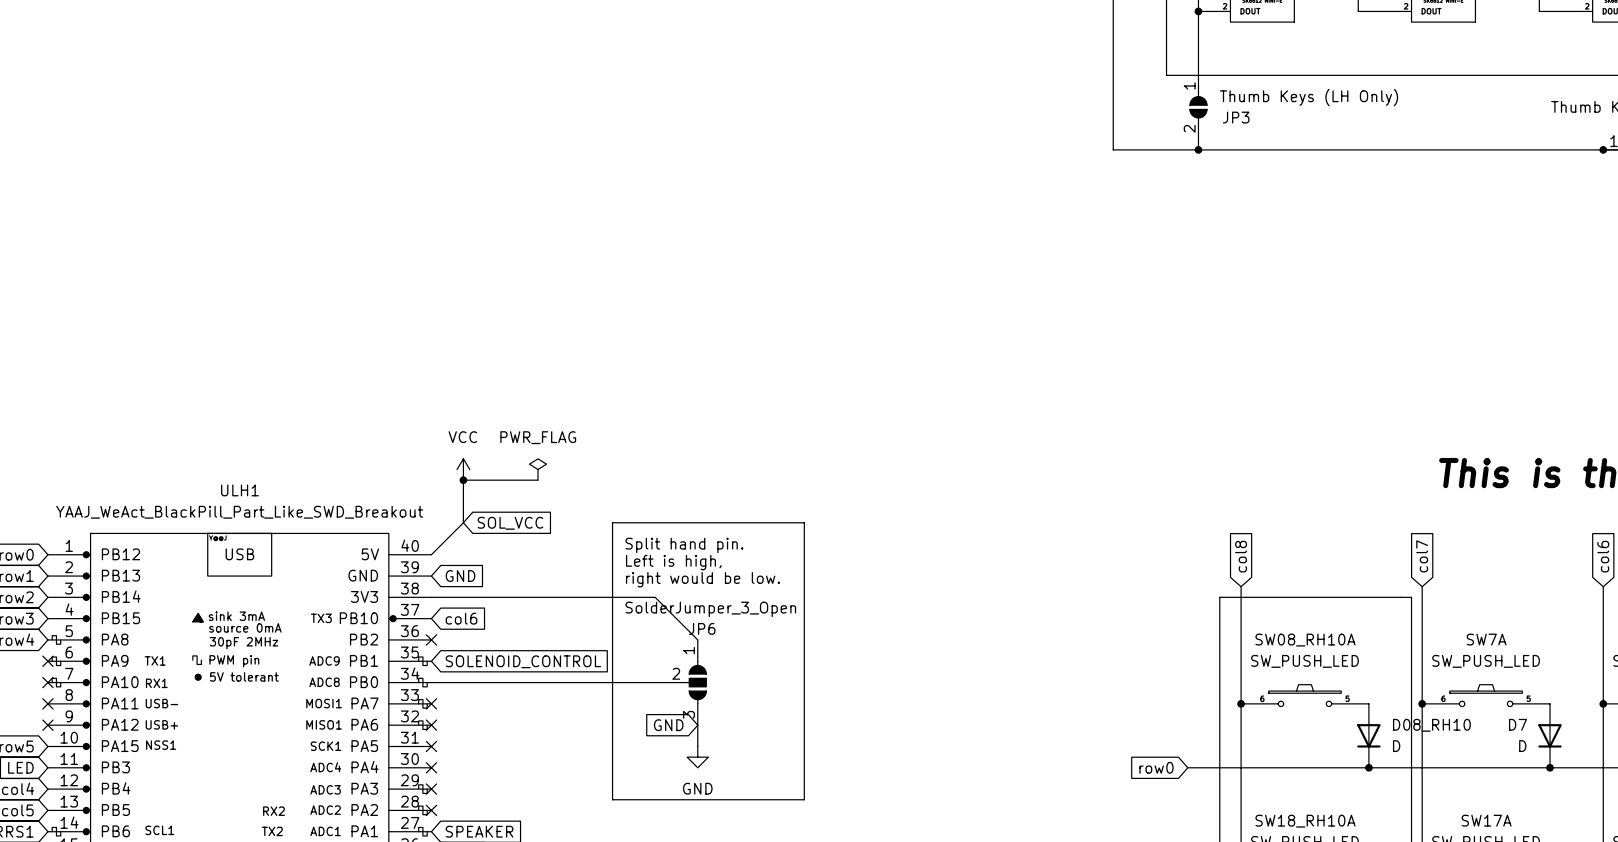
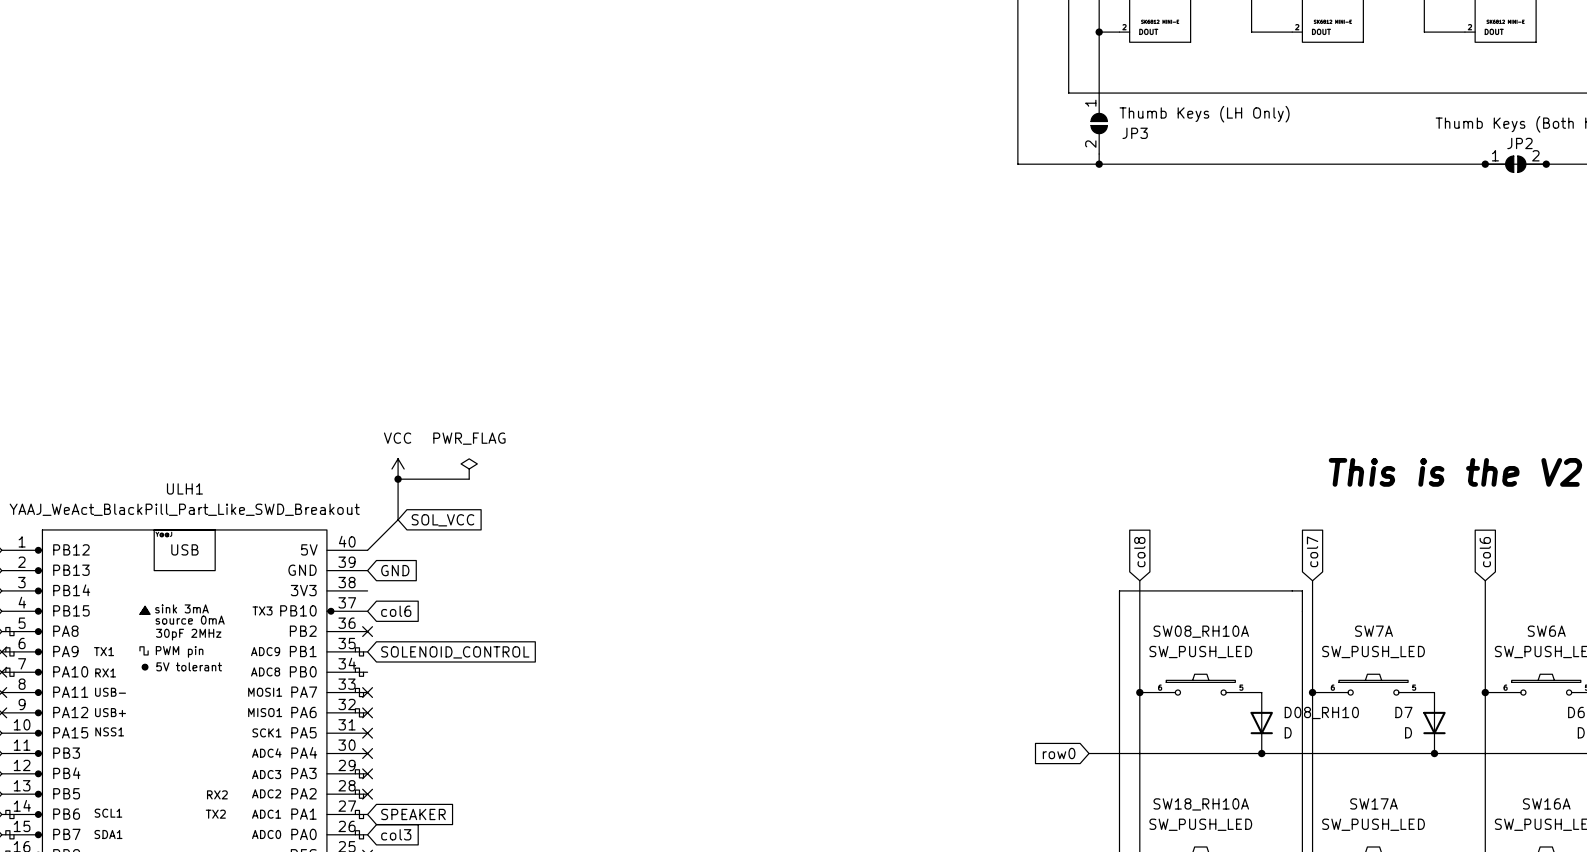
line: (612, 522) (612, 799) (804, 799) (804, 522) (612, 522) -> none
text: Split hand pin. (684, 545) -> none
text: Left is high, (673, 562) -> none
text: right would be low. (702, 579) -> none
wire: (431, 597) (655, 597) (697, 639) -> none
wire: (431, 682) (665, 682) -> none
JP6: SolderJumper_3_Open (686, 682) -> none
global label: GND (668, 725) -> none
wire: (697, 725) (697, 746) -> none
power symbol: GND (697, 757) -> none

